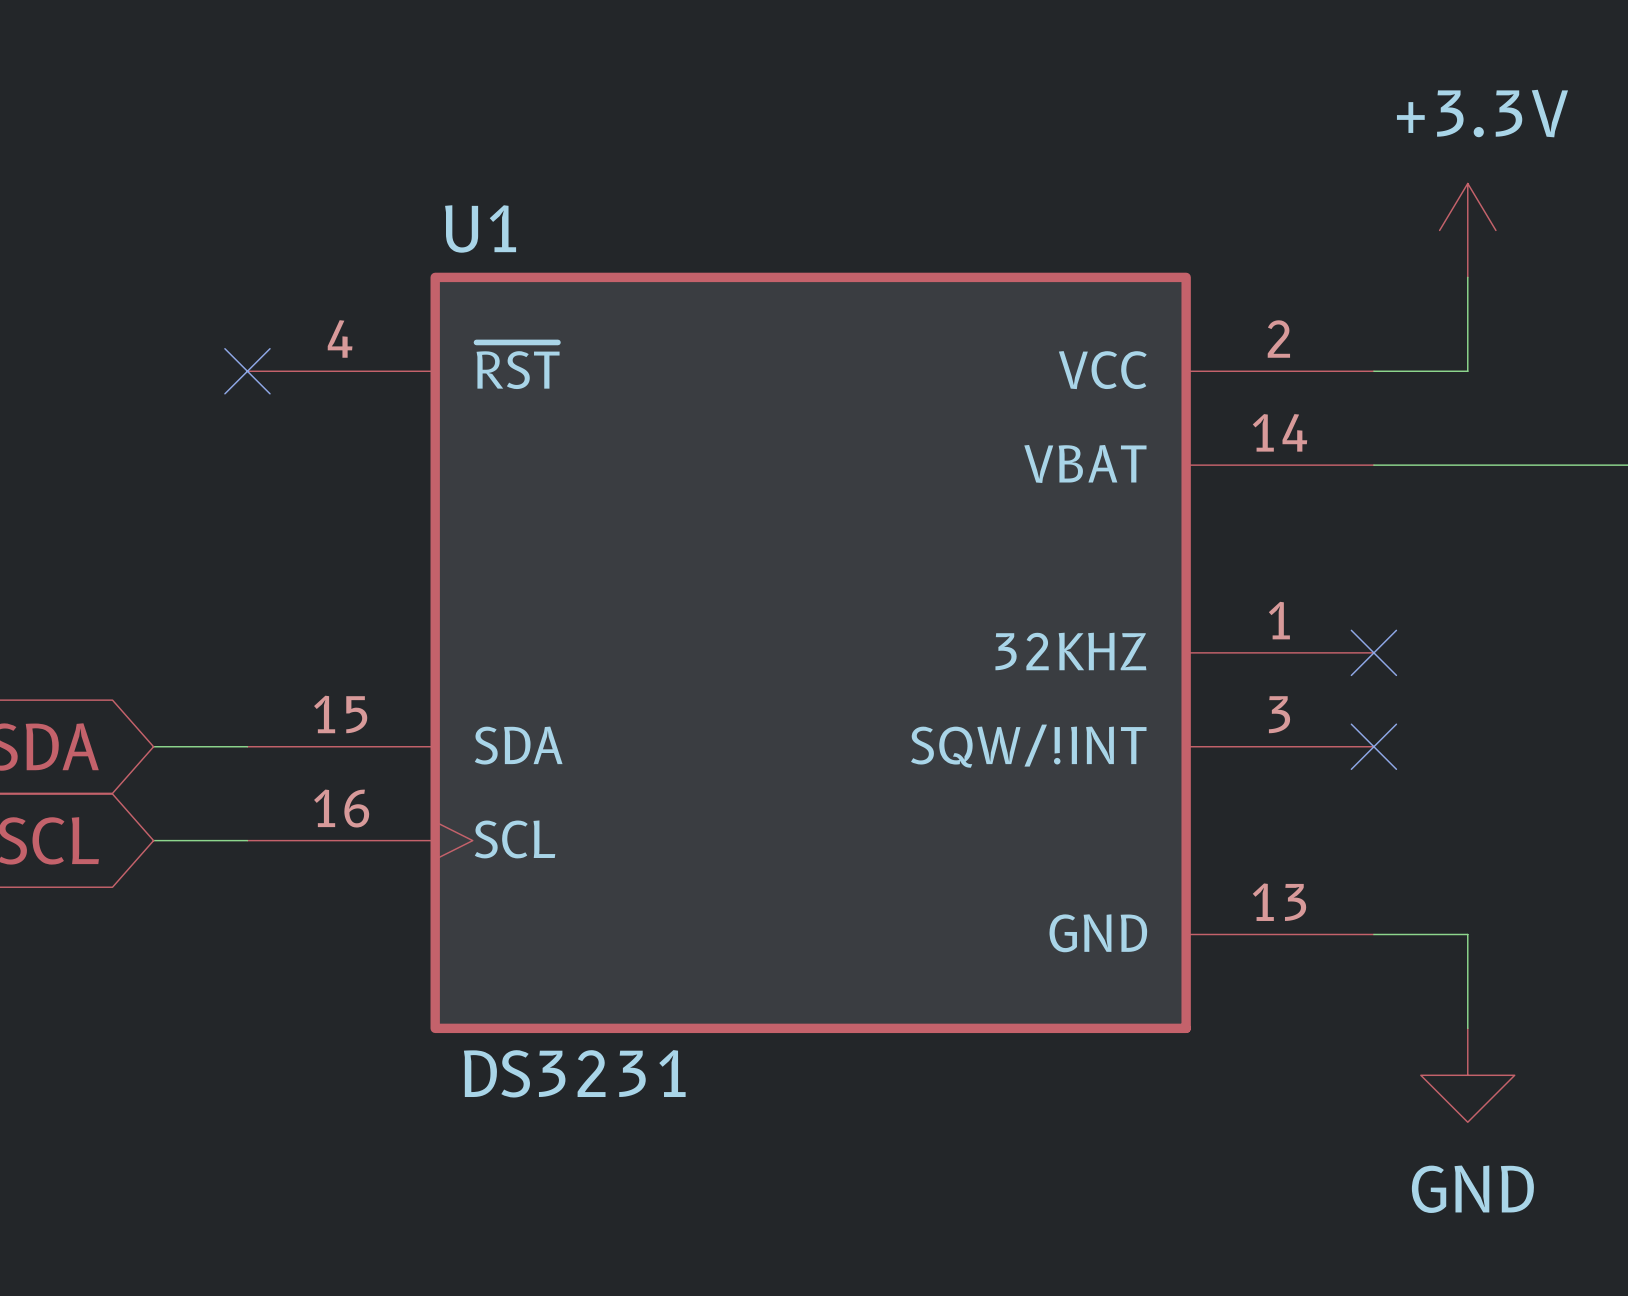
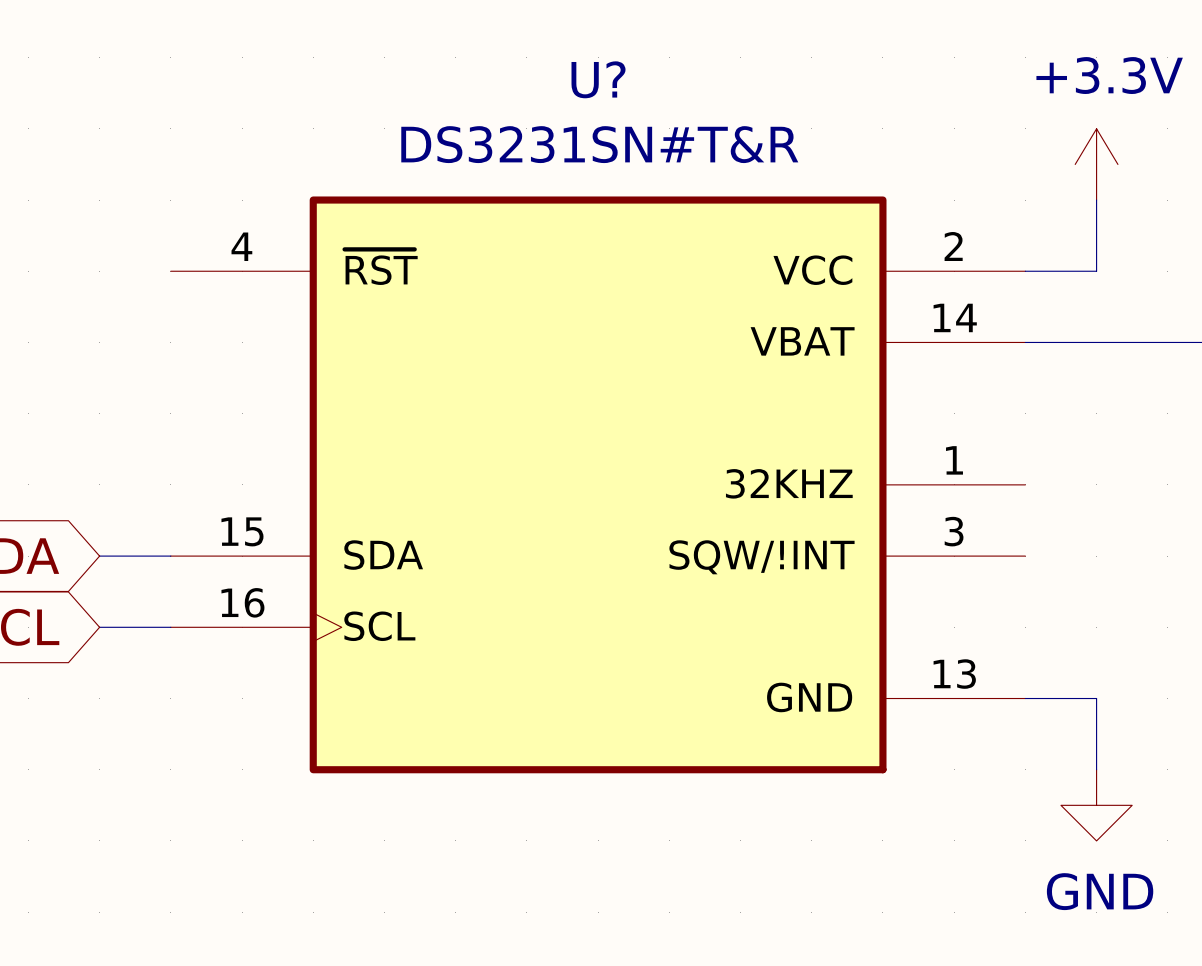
U1 name: U1 (480, 228) -> U? (598, 79)
no-connect mark: (247, 371) -> none
no-connect mark: (1373, 652) -> none
no-connect mark: (1373, 746) -> none
U1 value: DS3231 (574, 1073) -> DS3231SN#T&R (599, 144)

